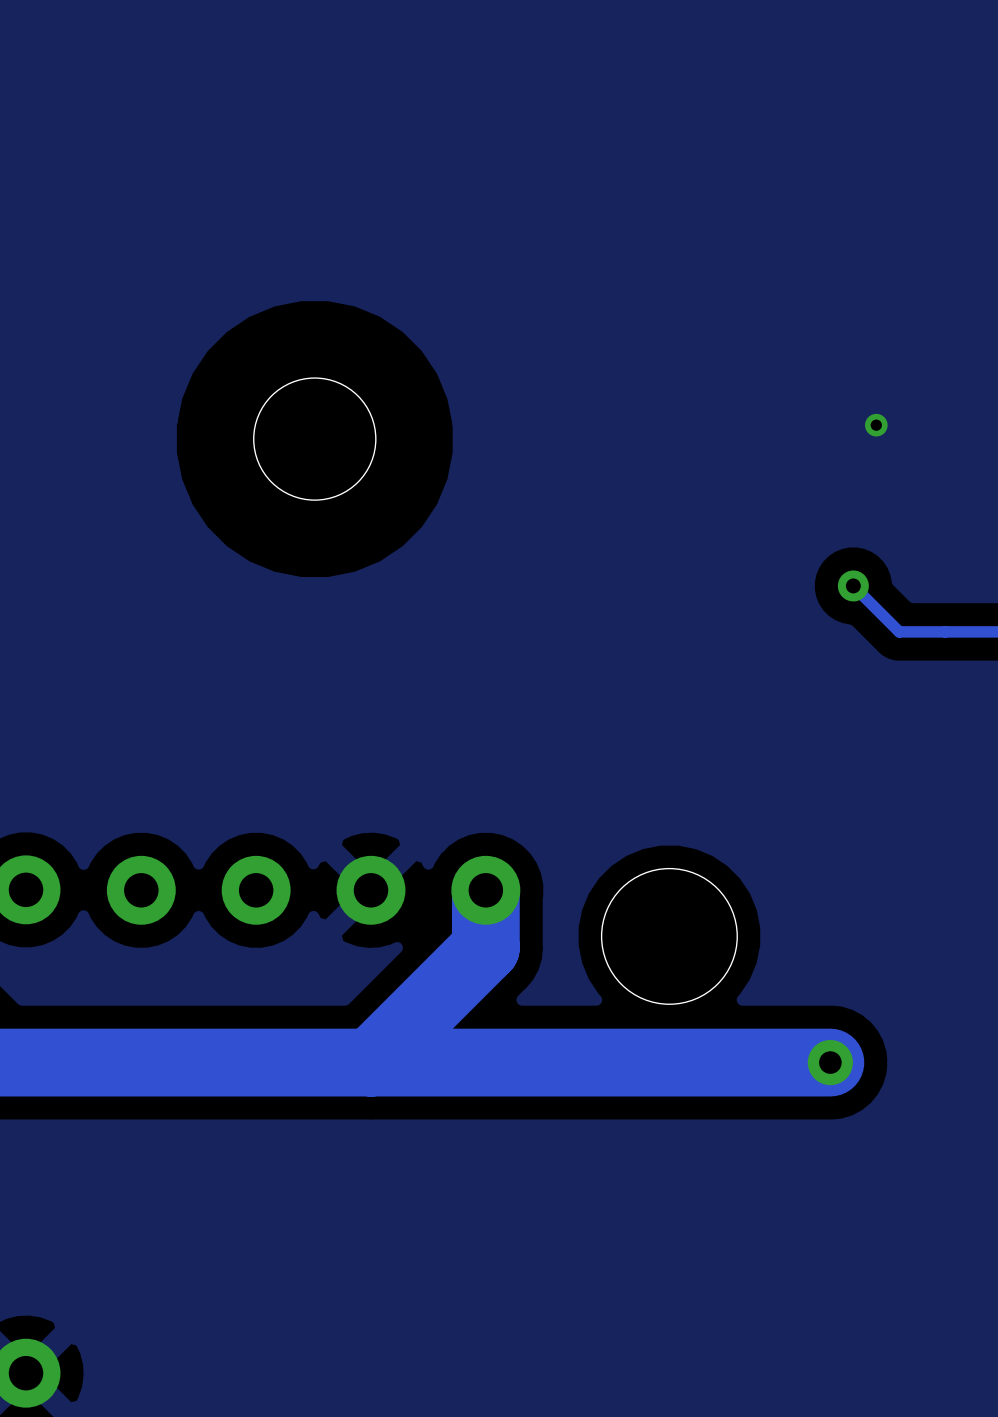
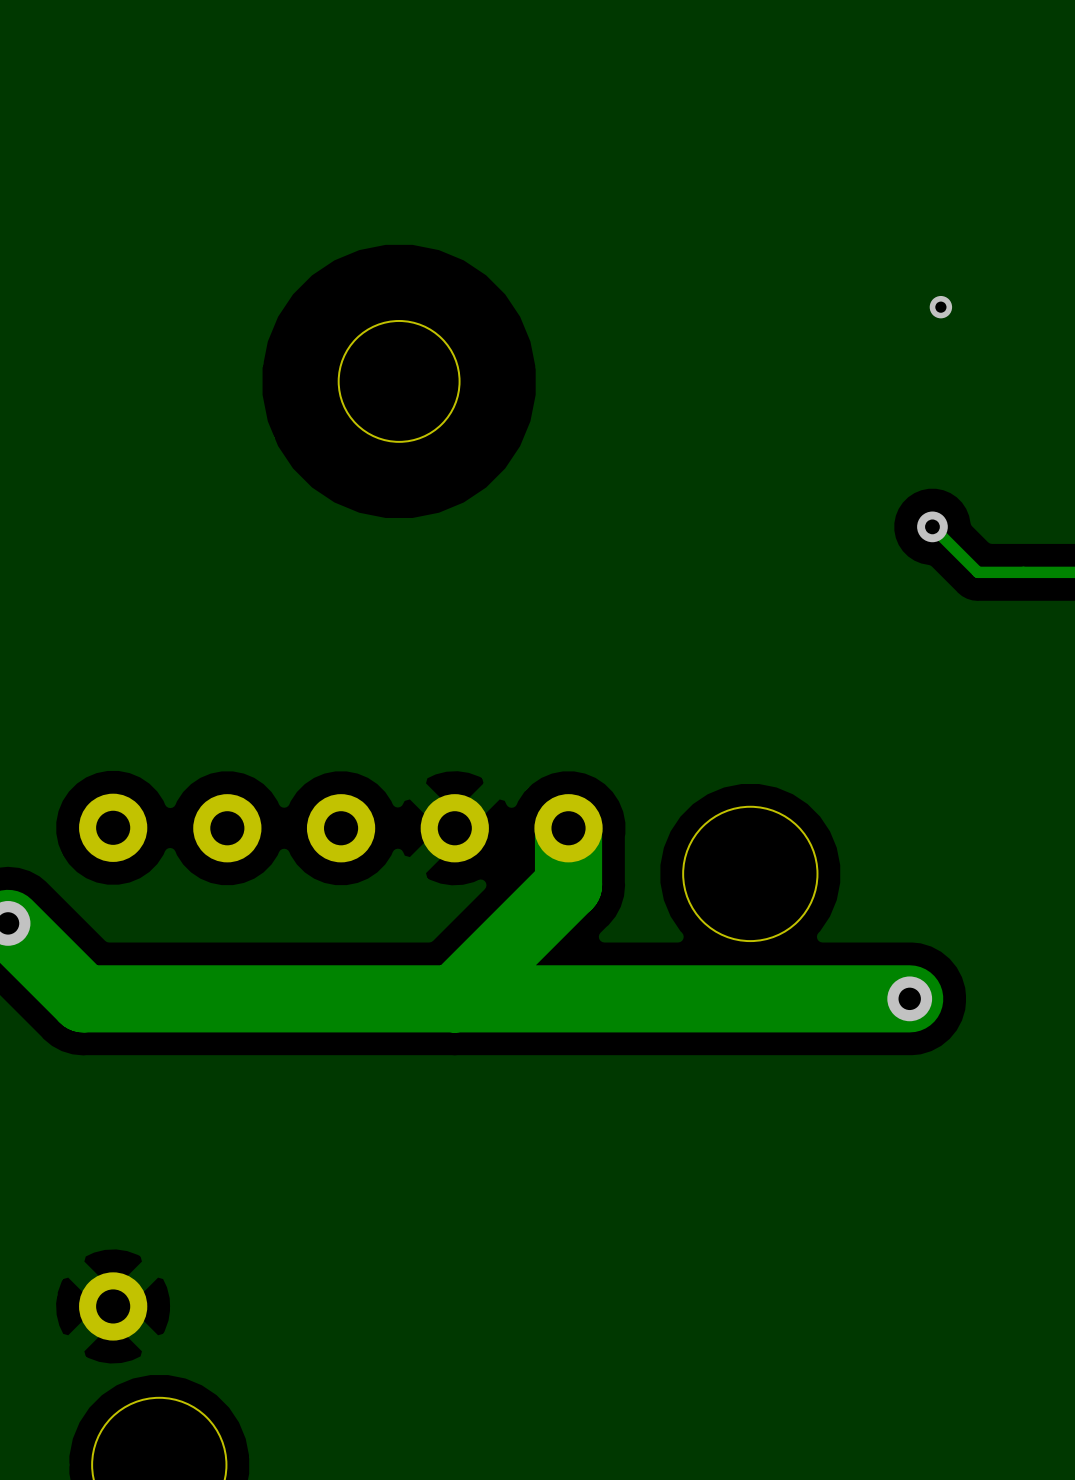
via position: (876, 425) -> (940, 307)

